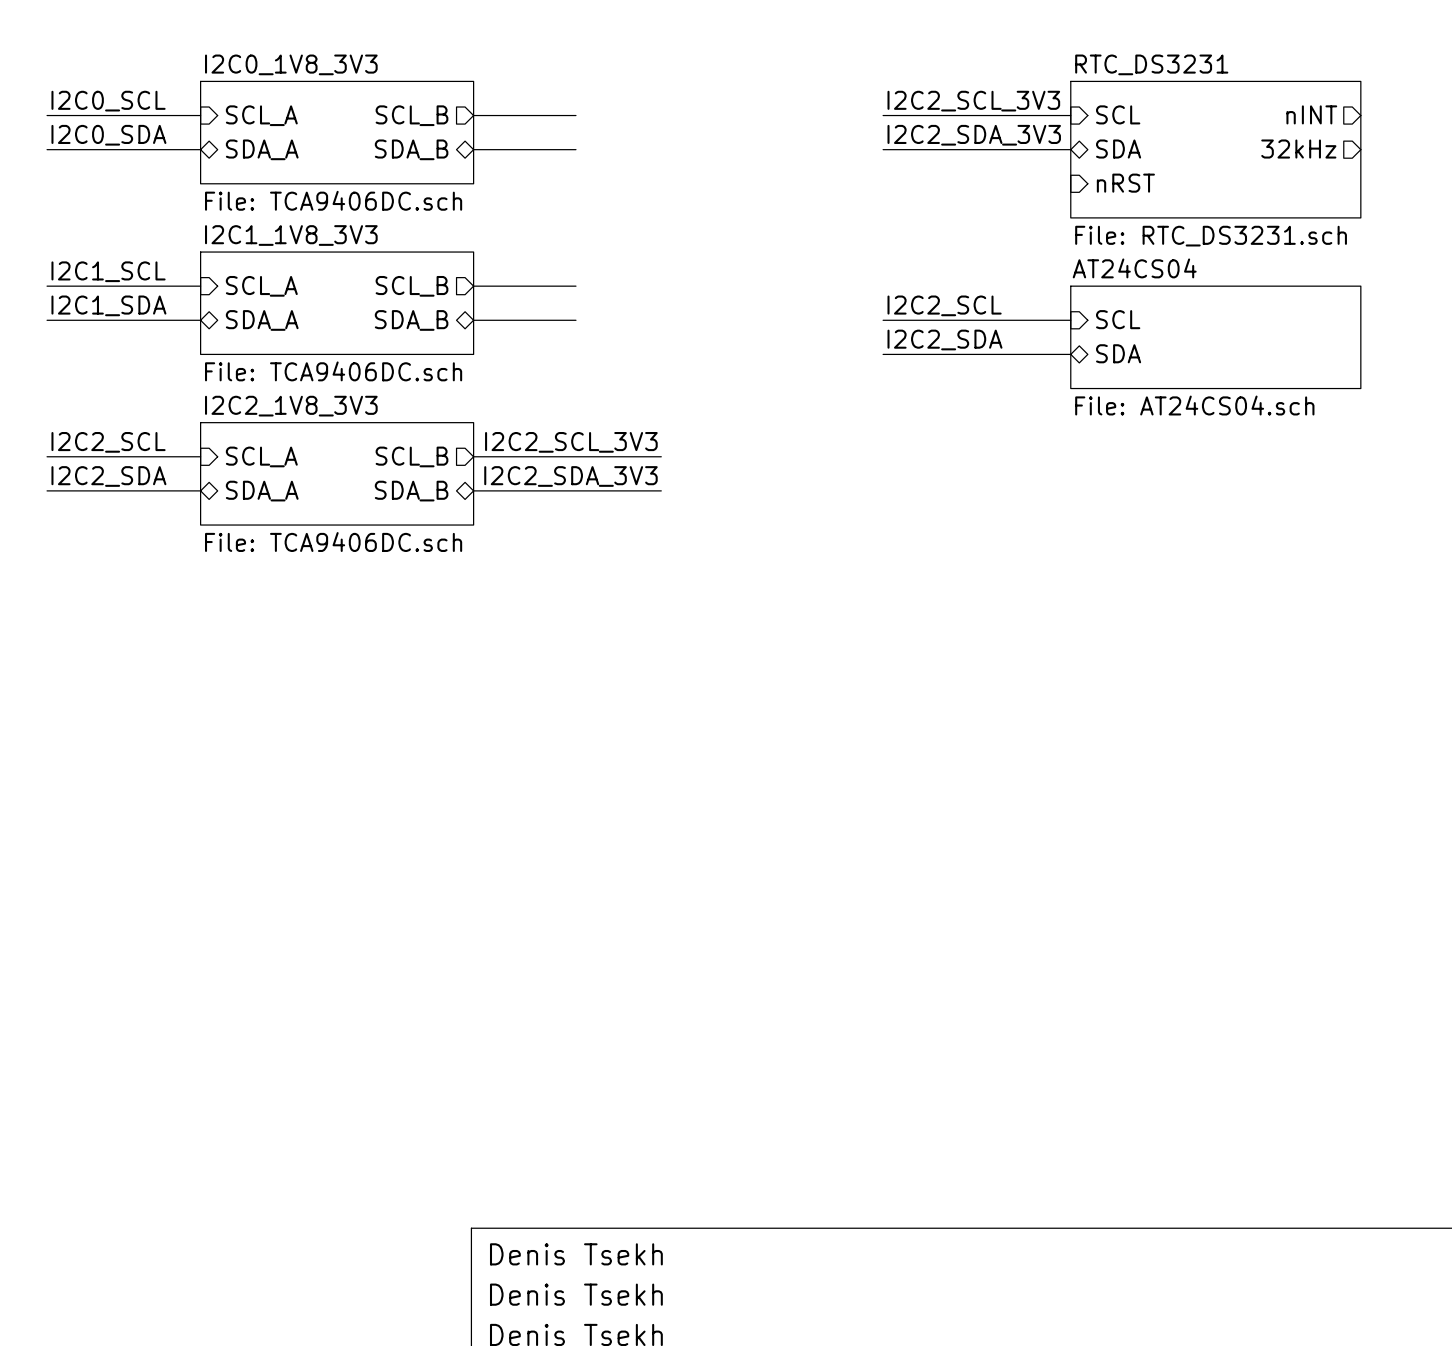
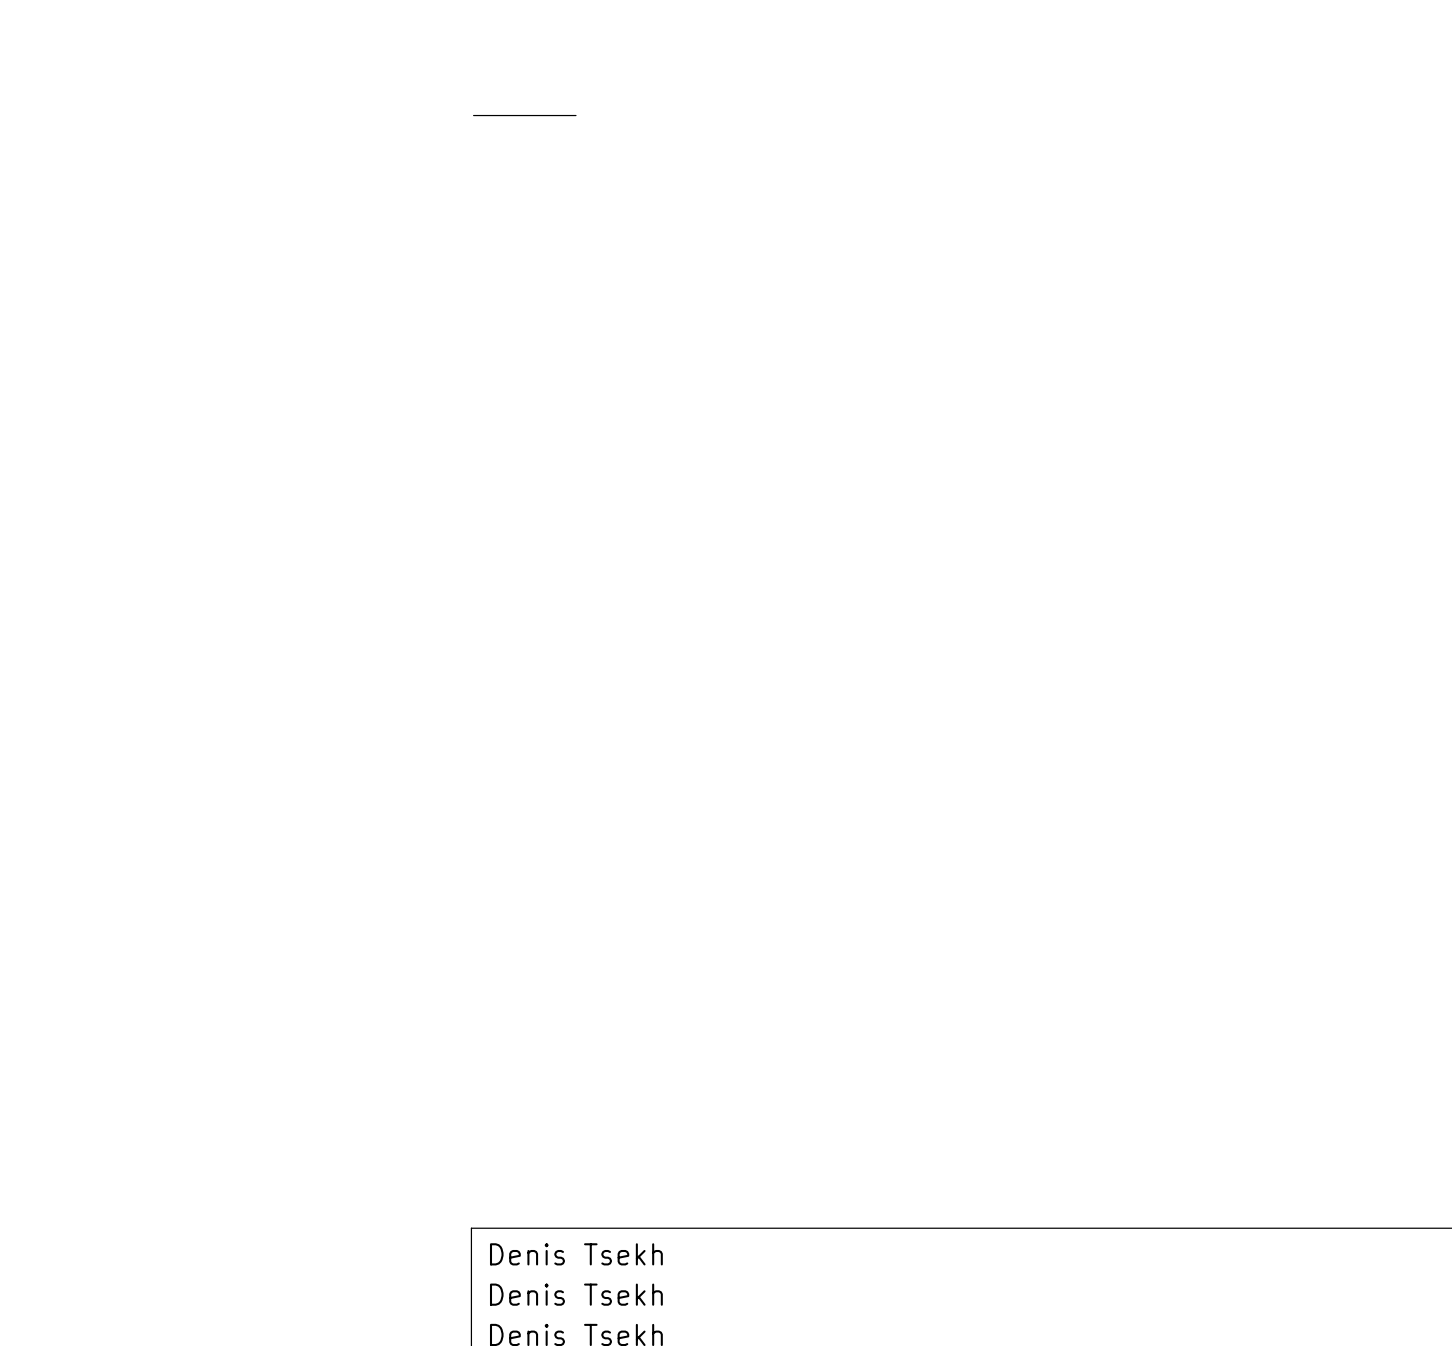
label: I2C0_SCL (108, 101) -> none
label: I2C2_SCL_3V3 (973, 101) -> none
sheet pin: SCL (1118, 114) -> none
sheet pin: nINT (1311, 114) -> none
wire: (47, 115) (200, 115) -> none
sheet pin: SCL_A (261, 115) -> none
sheet pin: SCL_B (412, 115) -> none
wire: (883, 115) (1070, 115) -> none
sheet I2C0_1V8_3V3: File: TCA9406DC.sch (337, 132) -> none
label: I2C0_SDA (108, 135) -> none
label: I2C2_SDA_3V3 (974, 135) -> none
wire: (47, 149) (200, 149) -> none
sheet pin: SDA_A (262, 149) -> none
sheet pin: SDA_B (411, 149) -> none
wire: (473, 149) (575, 149) -> none
wire: (883, 149) (1070, 149) -> none
sheet pin: SDA (1118, 149) -> none
sheet RTC_DS3231: File: RTC_DS3231.sch (1215, 149) -> none
sheet pin: 32kHz (1298, 149) -> none
sheet pin: nRST (1125, 183) -> none
label: I2C1_SCL (108, 271) -> none
wire: (47, 286) (200, 286) -> none
sheet pin: SCL_A (261, 286) -> none
sheet pin: SCL_B (412, 286) -> none
wire: (473, 286) (575, 286) -> none
sheet I2C1_1V8_3V3: File: TCA9406DC.sch (337, 303) -> none
label: I2C1_SDA (108, 305) -> none
label: I2C2_SCL (944, 305) -> none
sheet pin: SCL (1118, 319) -> none
wire: (47, 320) (200, 320) -> none
sheet pin: SDA_A (262, 320) -> none
sheet pin: SDA_B (411, 320) -> none
wire: (473, 320) (575, 320) -> none
wire: (883, 320) (1070, 320) -> none
sheet AT24CS04: File: AT24CS04.sch (1215, 337) -> none
label: I2C2_SDA (944, 339) -> none
sheet pin: SDA (1118, 353) -> none
wire: (883, 354) (1070, 354) -> none
label: I2C2_SCL (108, 442) -> none
label: I2C2_SCL_3V3 (571, 442) -> none
wire: (47, 456) (200, 456) -> none
sheet pin: SCL_A (261, 456) -> none
sheet pin: SCL_B (412, 456) -> none
wire: (473, 456) (661, 456) -> none
sheet I2C2_1V8_3V3: File: TCA9406DC.sch (337, 473) -> none
label: I2C2_SDA (108, 476) -> none
label: I2C2_SDA_3V3 (570, 476) -> none
wire: (47, 490) (200, 490) -> none
wire: (473, 490) (661, 490) -> none
sheet pin: SDA_A (262, 491) -> none
sheet pin: SDA_B (411, 491) -> none

